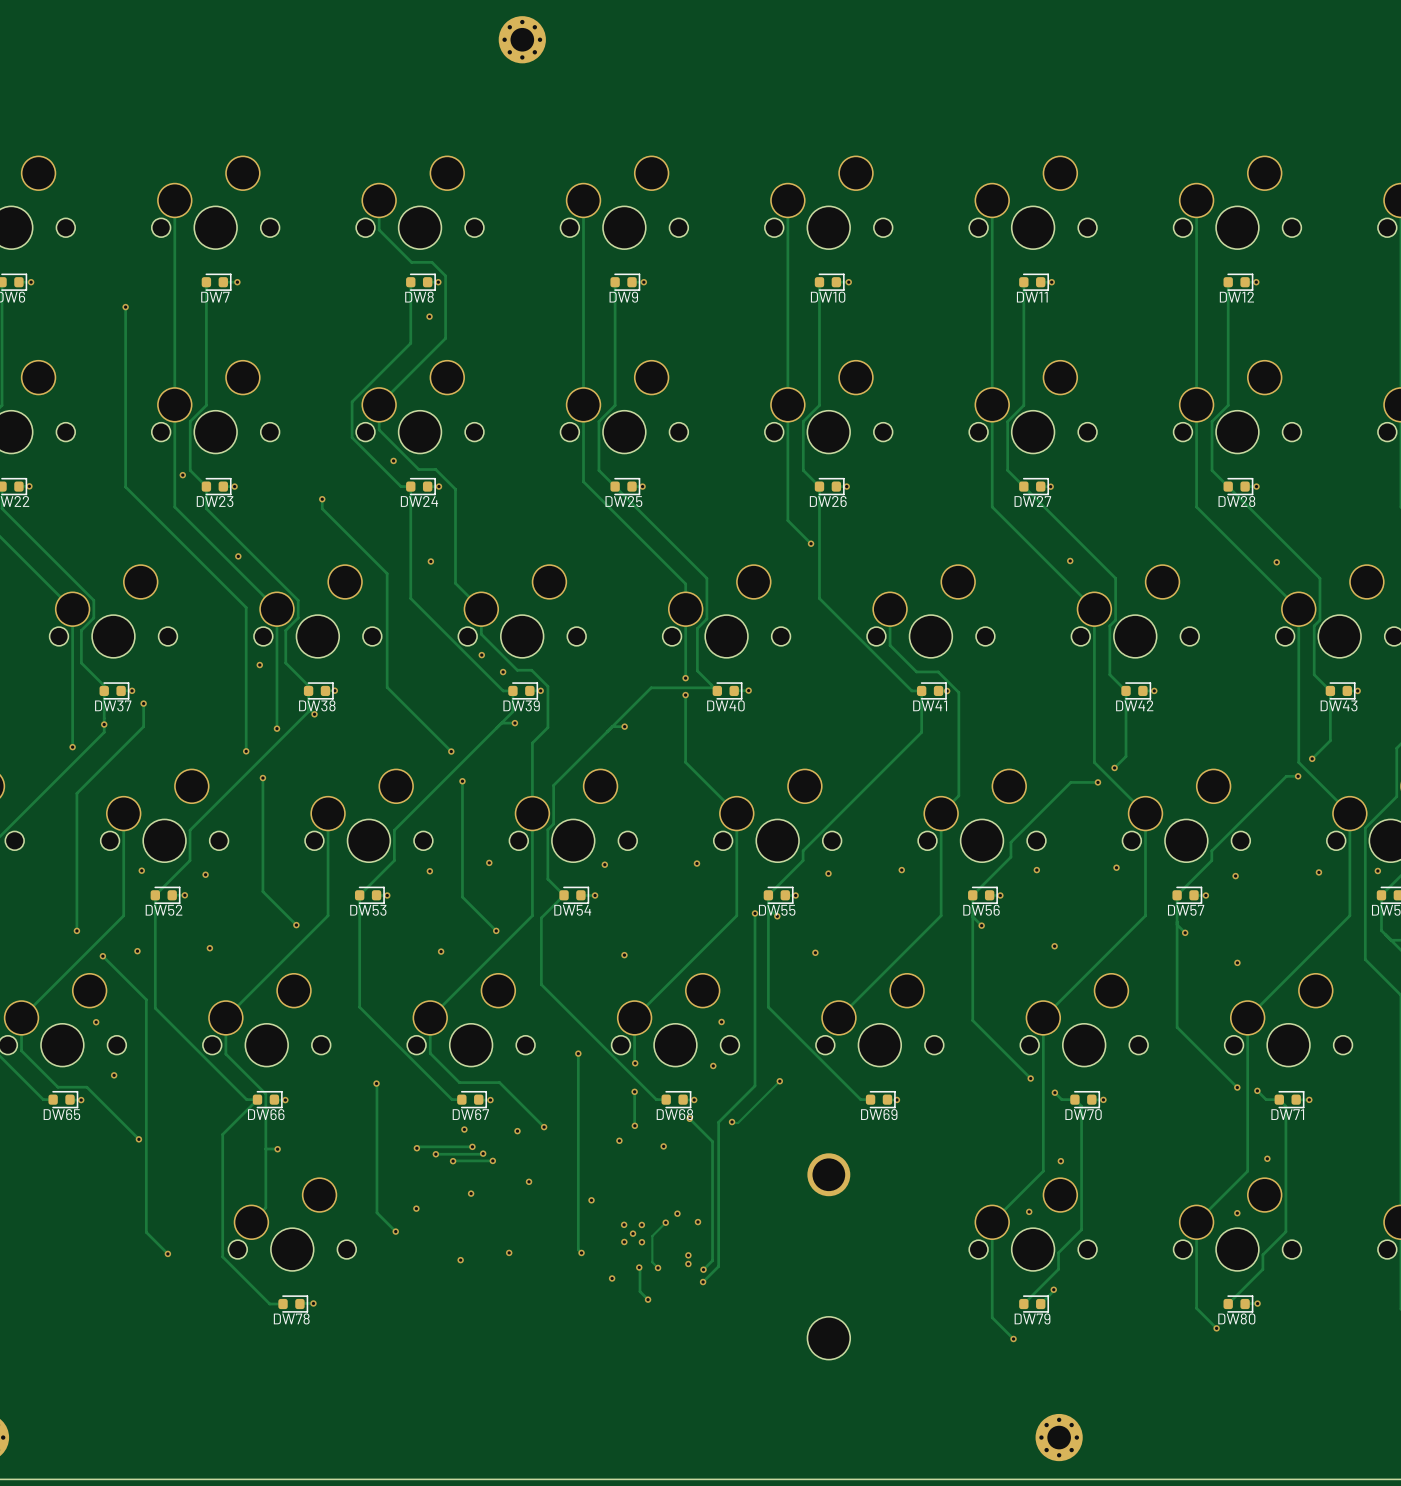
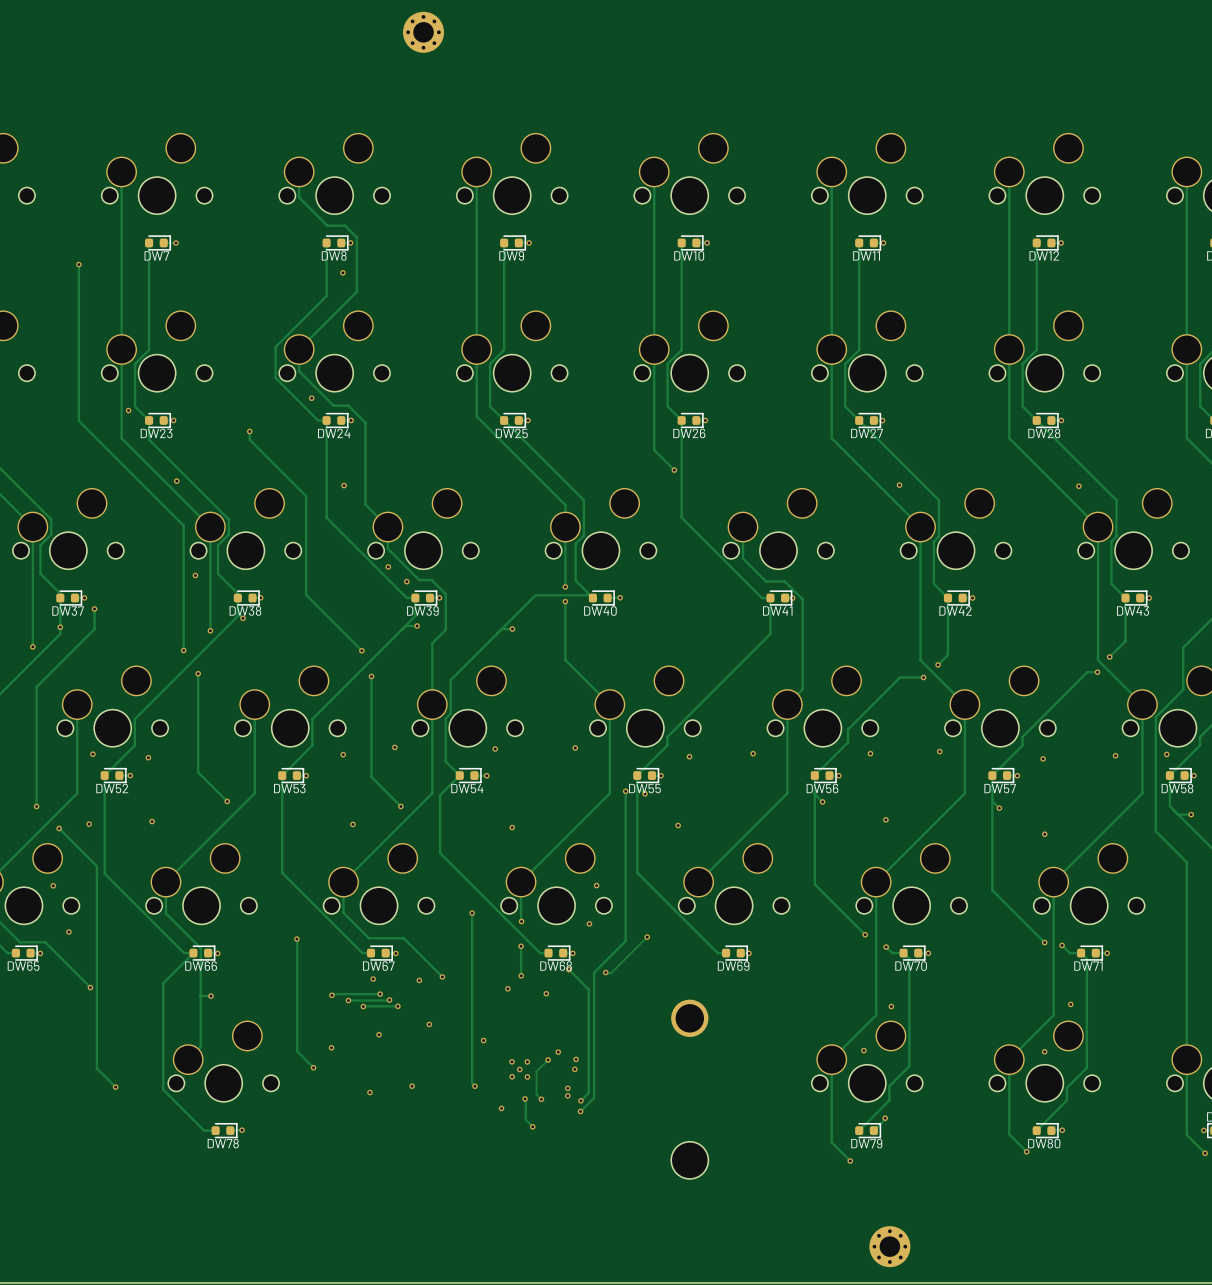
via: none -> (574, 1069)

